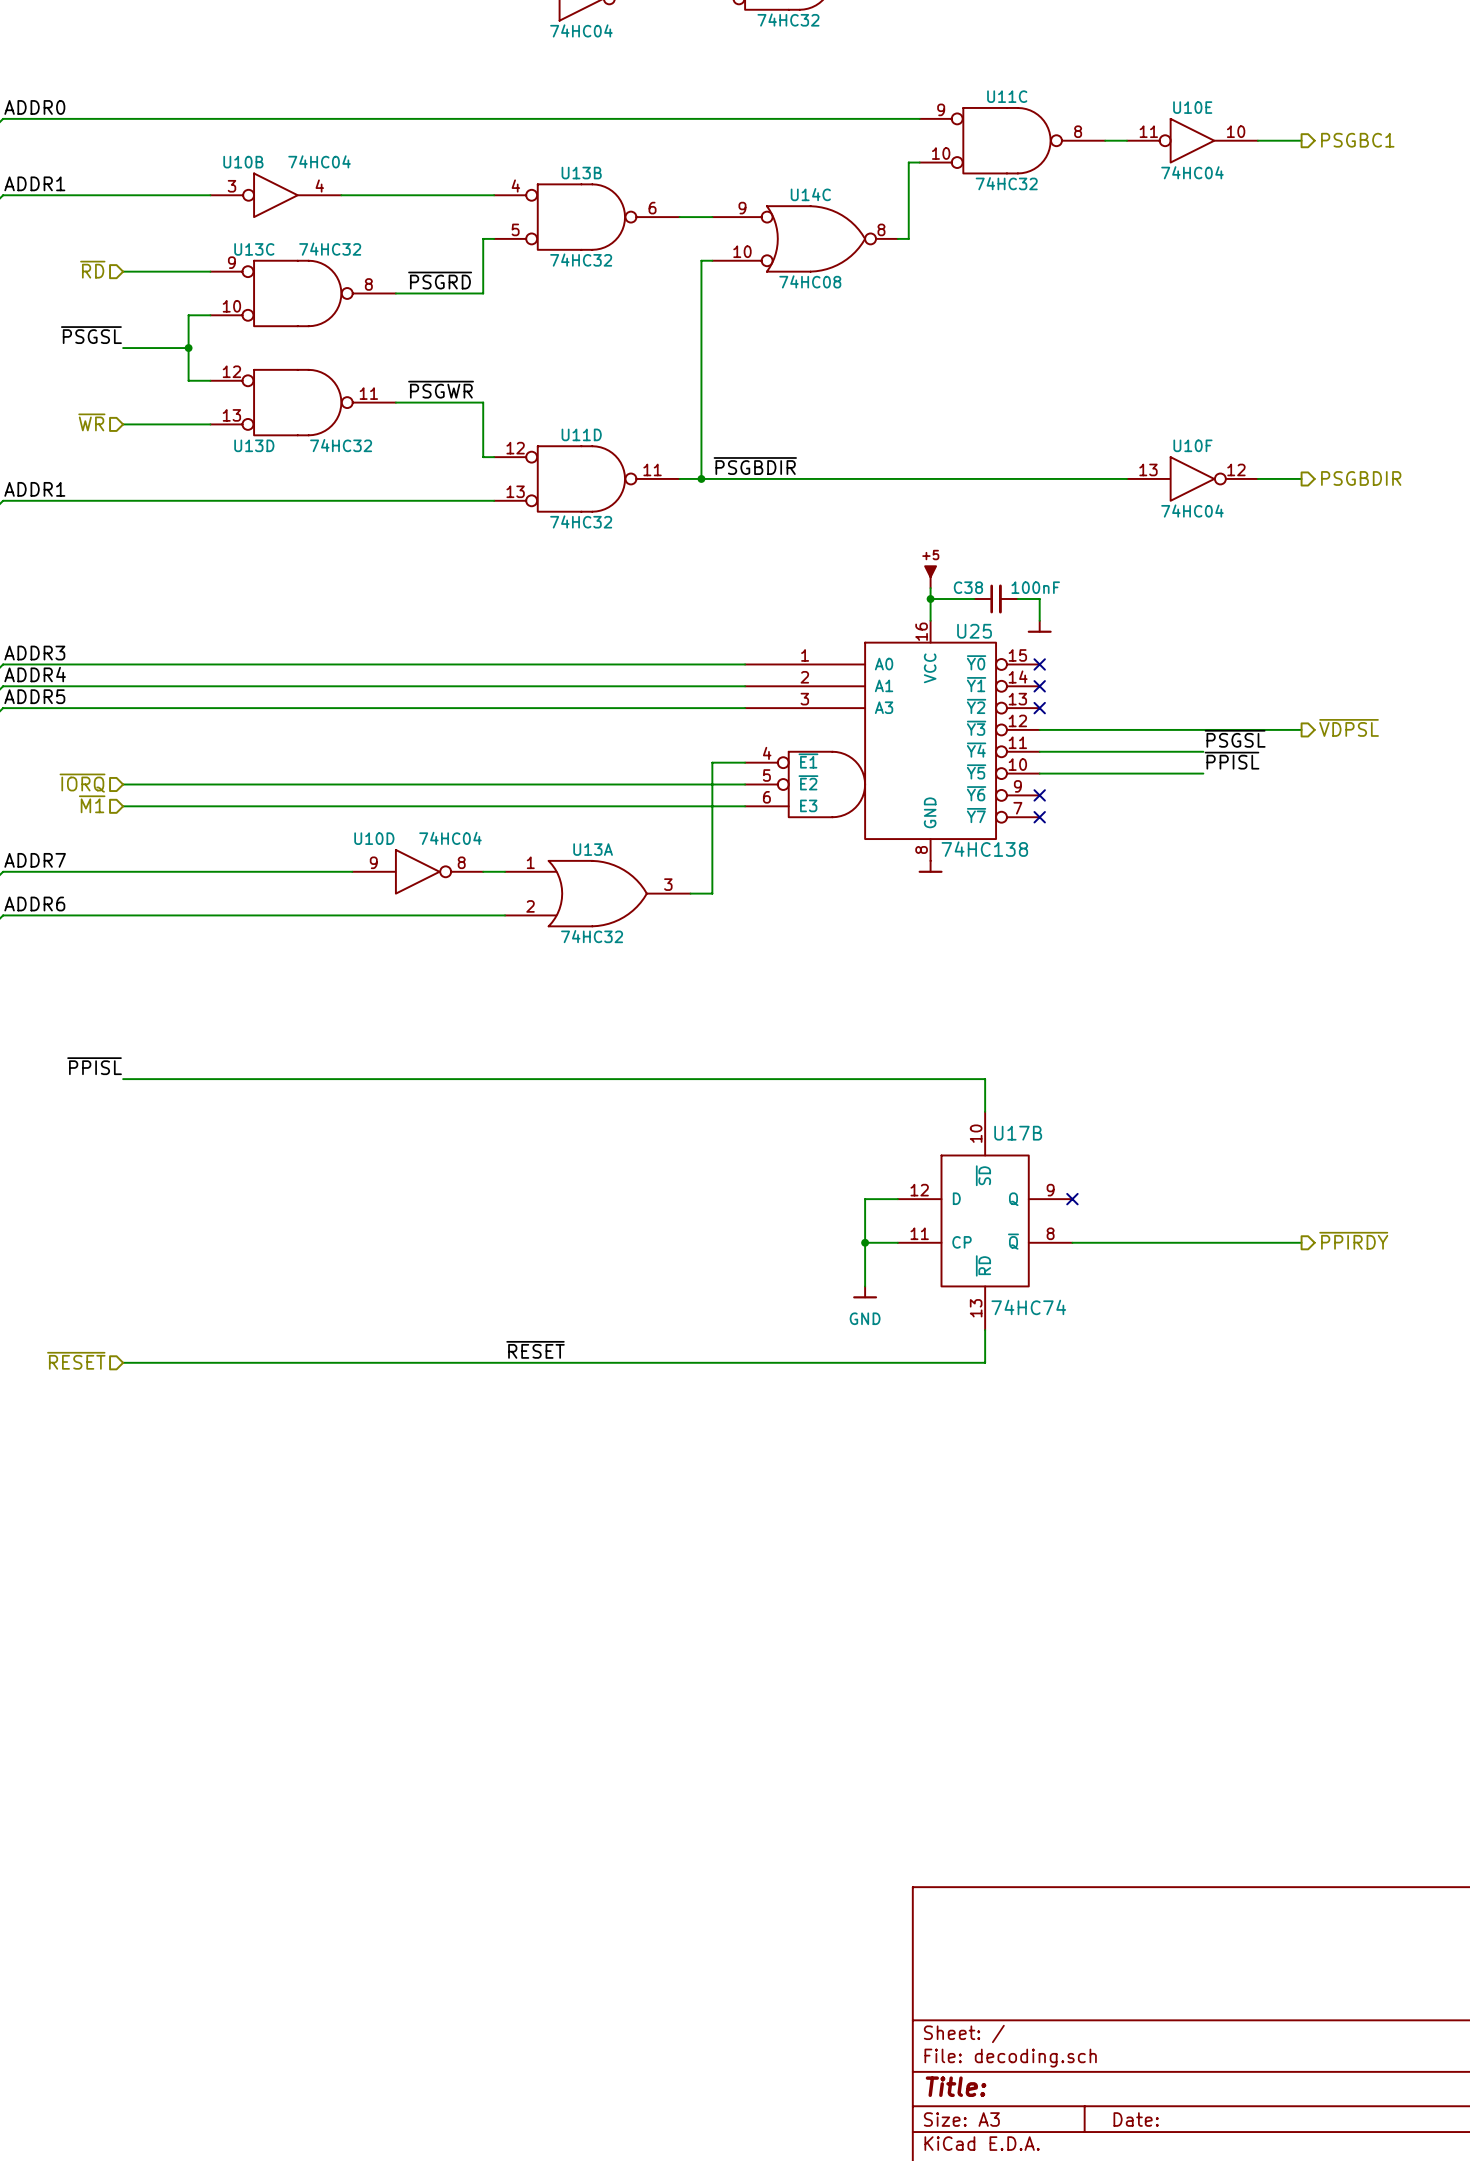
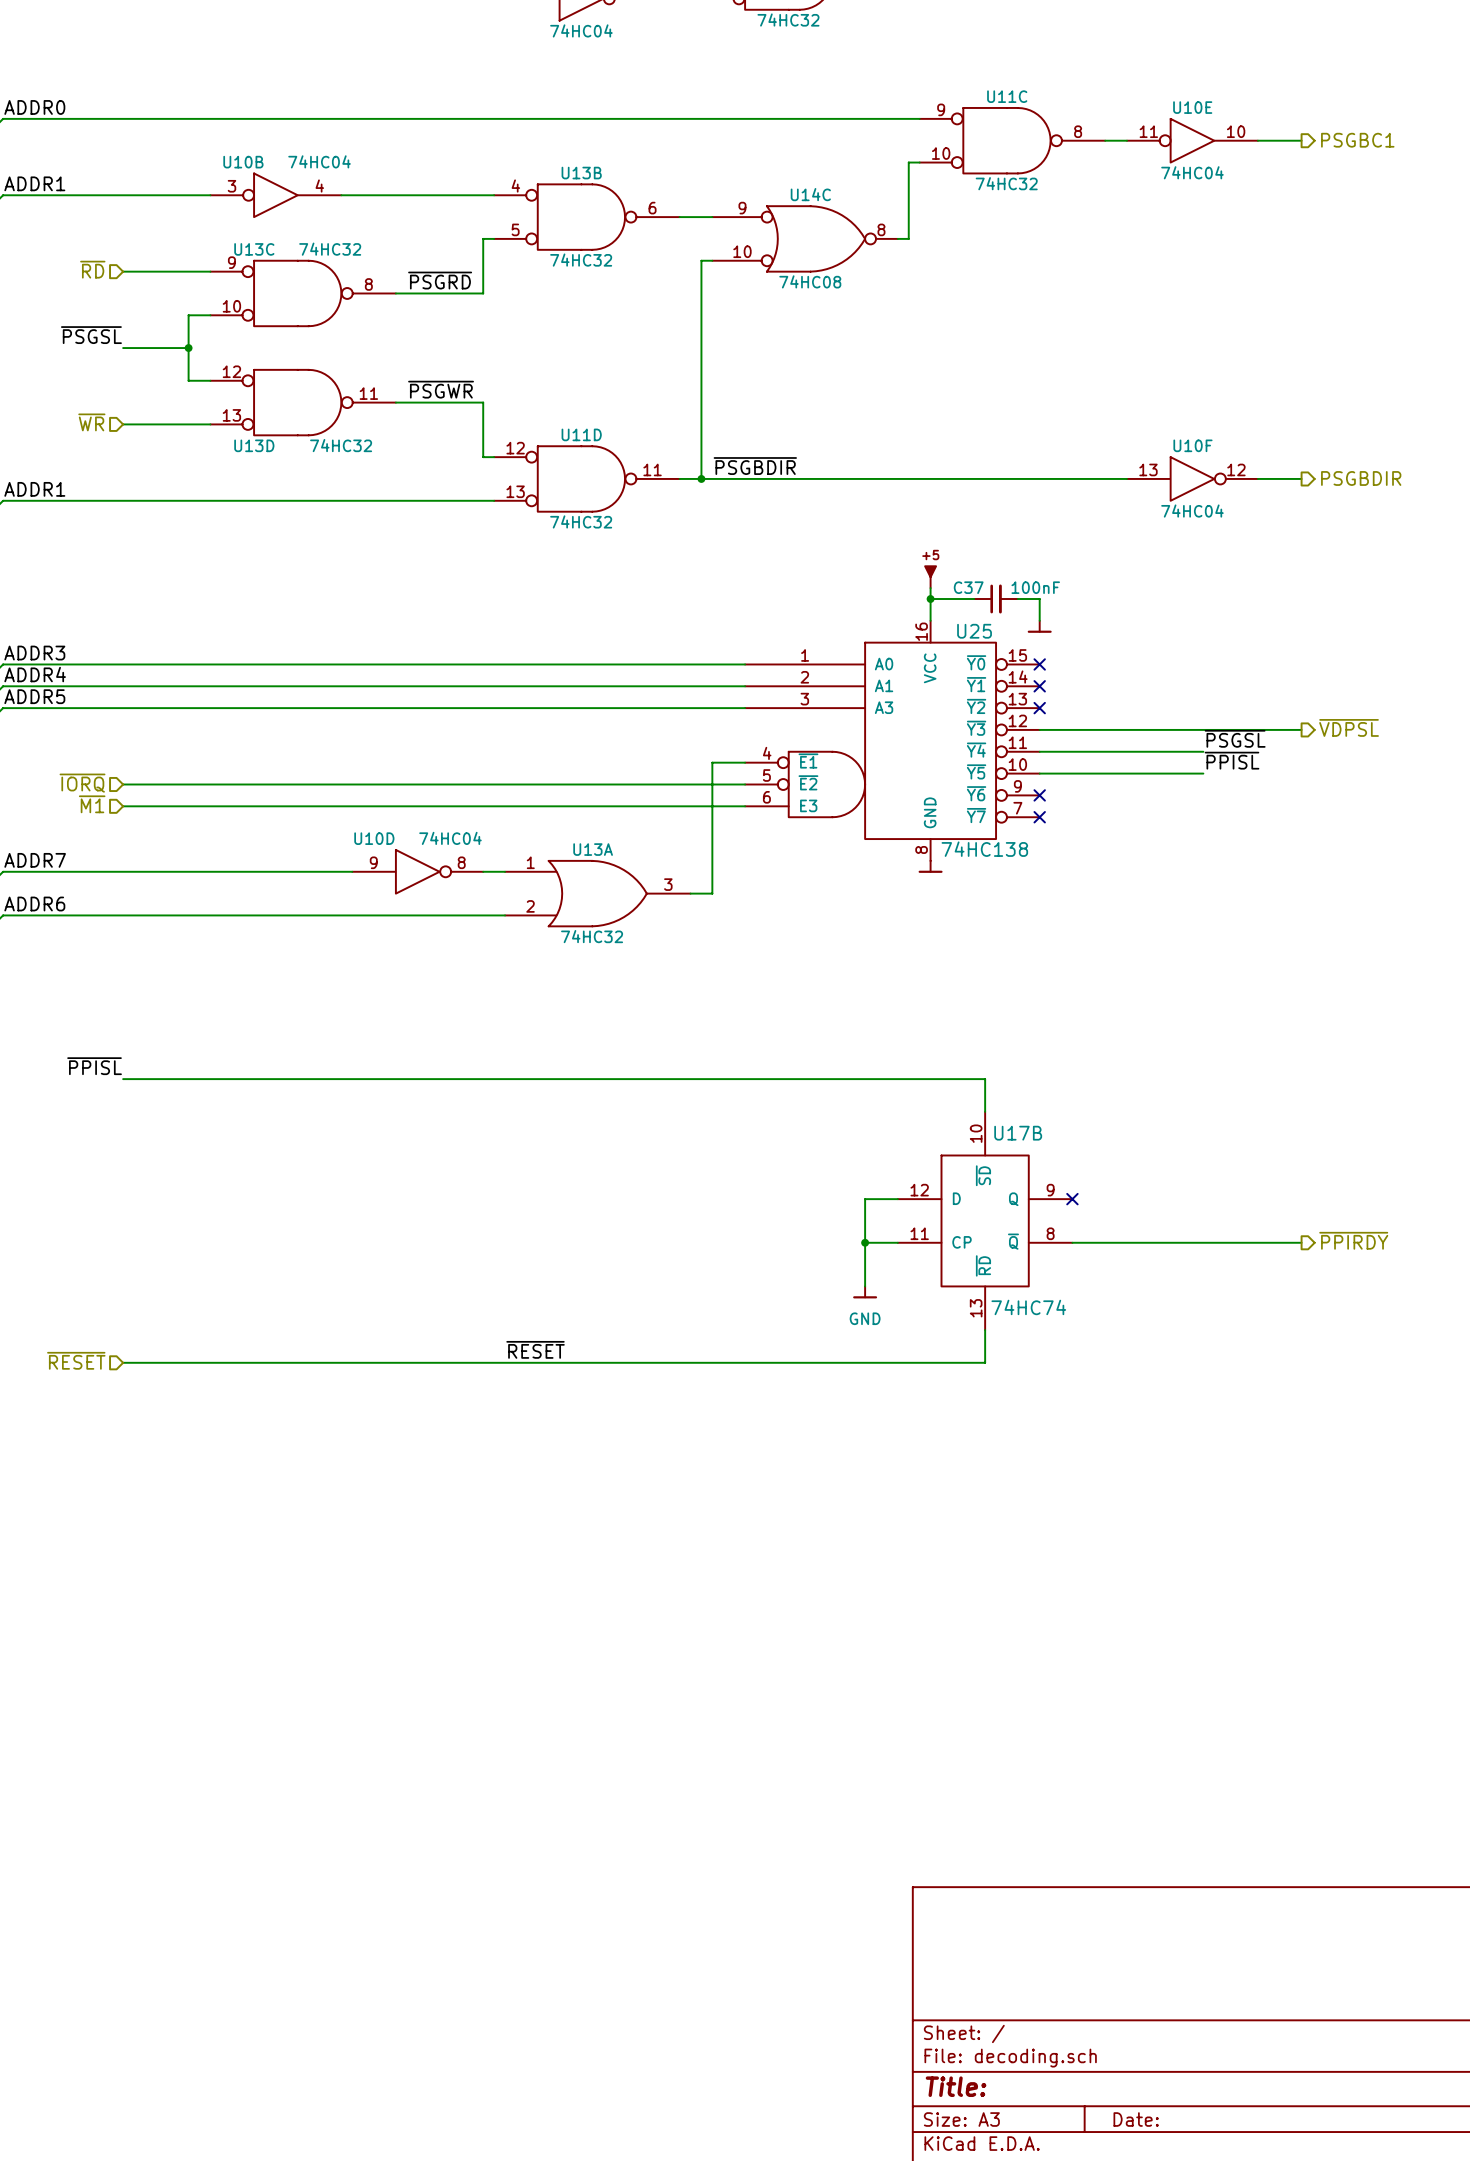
C38 name: C38 (968, 587) -> C37 (968, 587)

